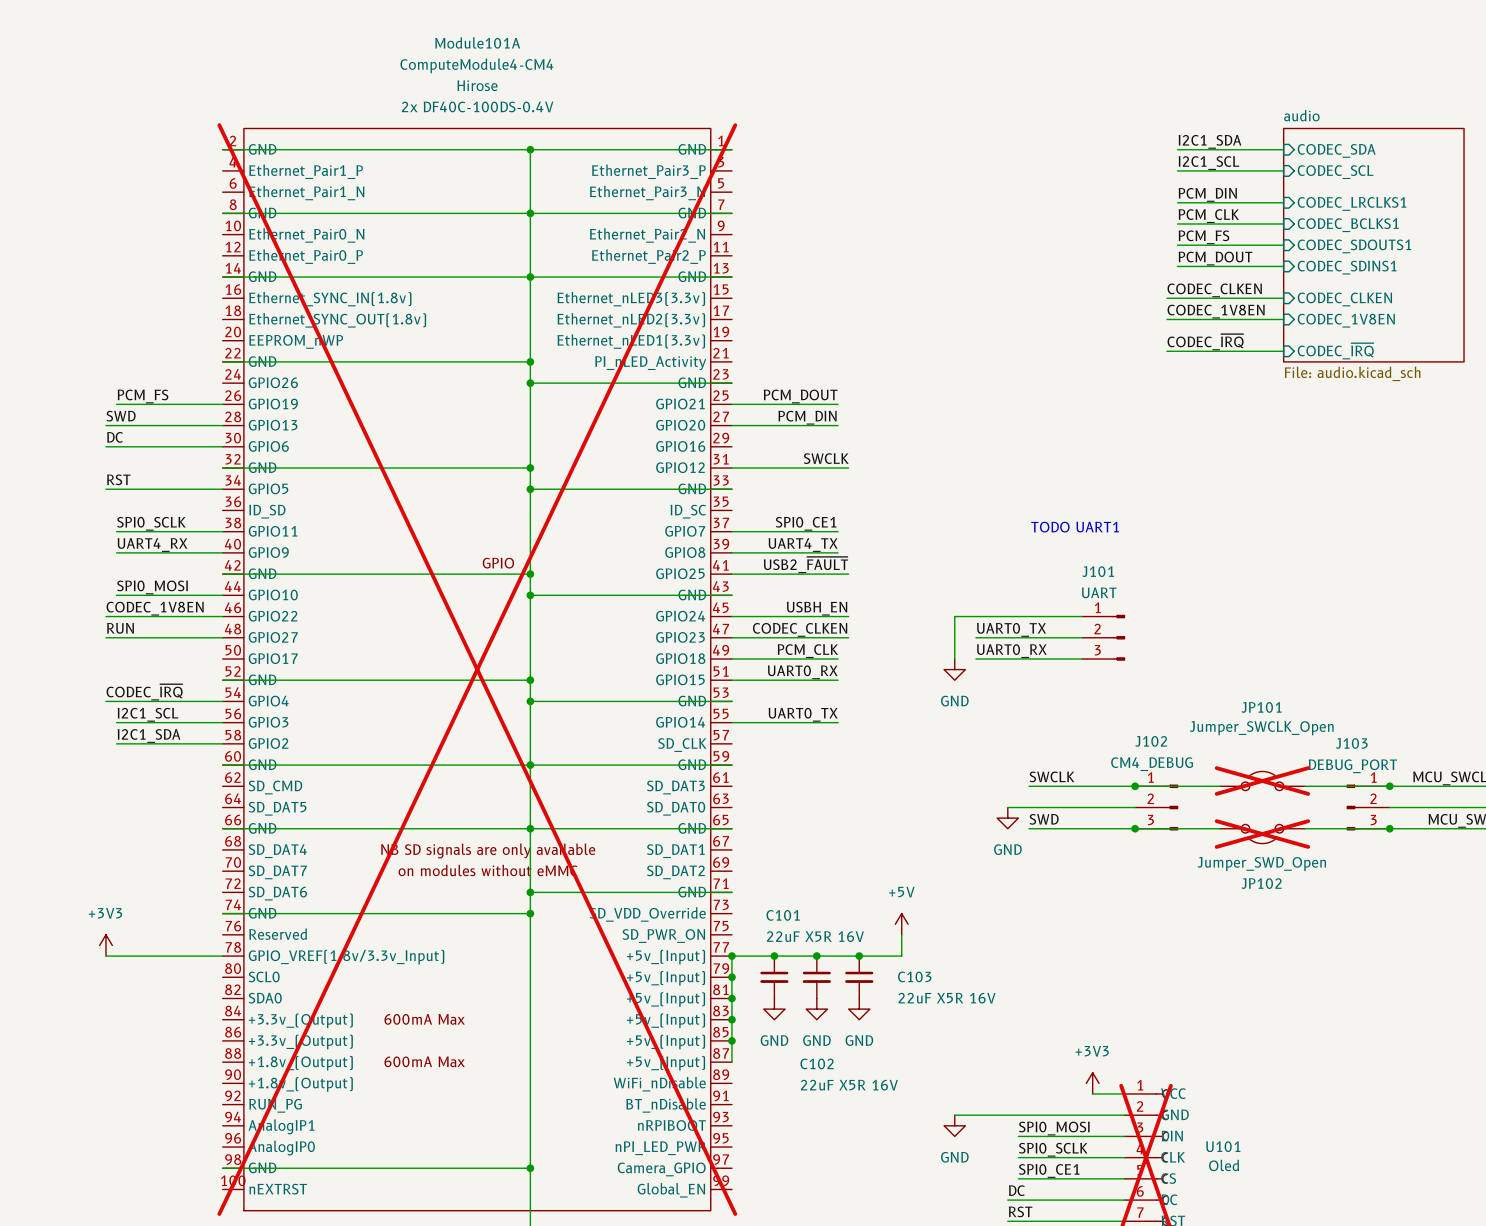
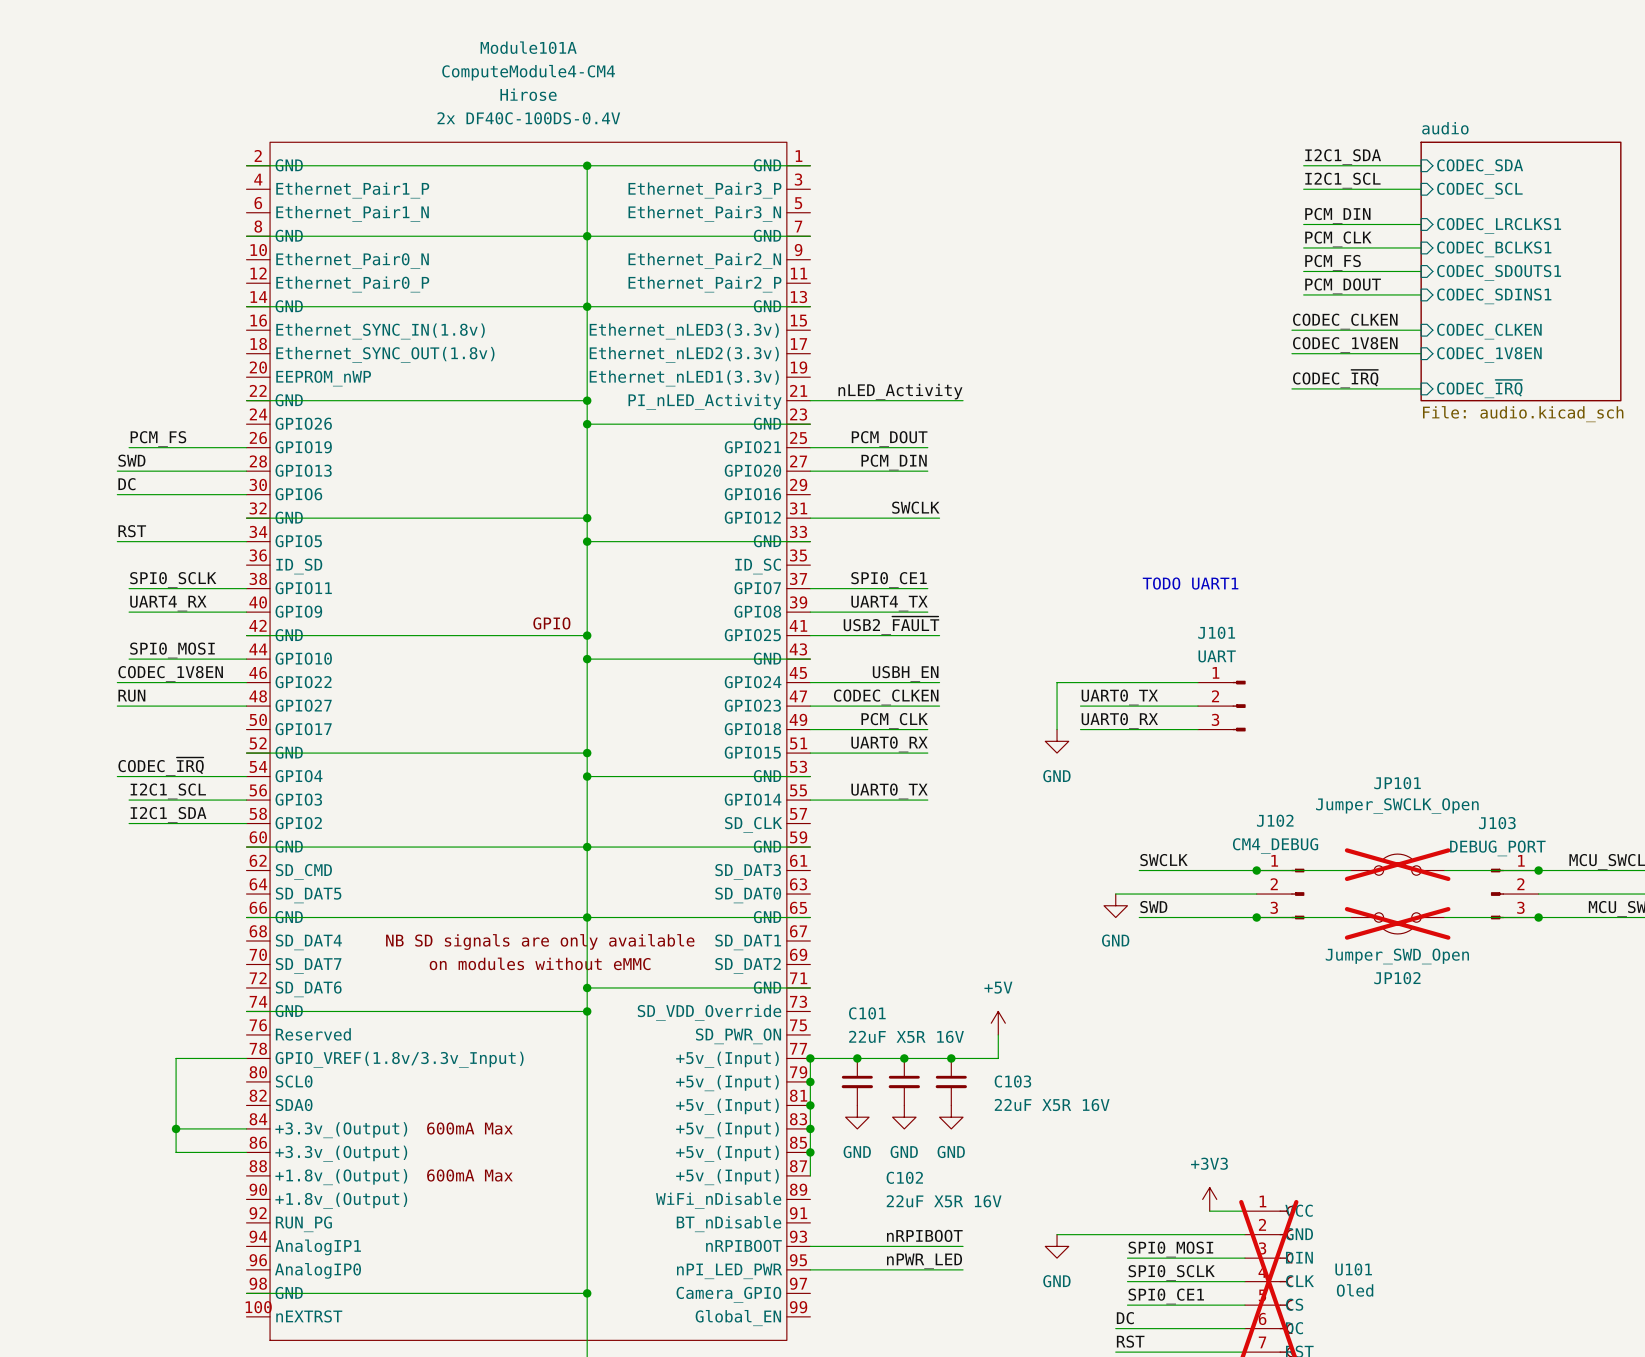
label: none -> nLED_Activity (900, 391)
wire: none -> (810, 400) (963, 400)
Module101A do-not-place cross: (477, 669) -> none
power symbol: +3V3 (105, 945) -> none
wire: (105, 956) (159, 956) -> (246, 1152) (176, 1152) (176, 1058)
wire: none -> (176, 1128) (246, 1128)
junction: none -> (176, 1128)
label: none -> nRPIBOOT (924, 1235)
wire: none -> (810, 1246) (963, 1246)
label: none -> nPWR_LED (924, 1261)
wire: none -> (810, 1269) (963, 1269)

